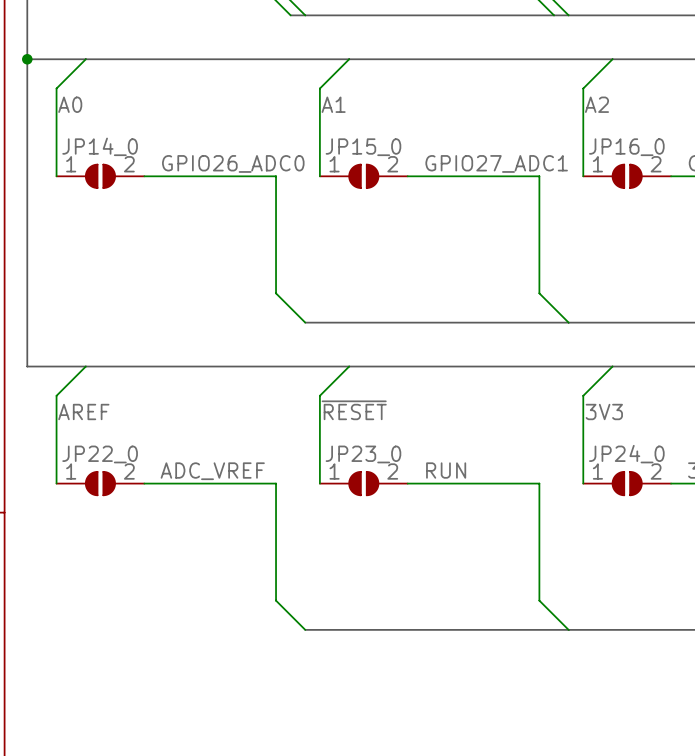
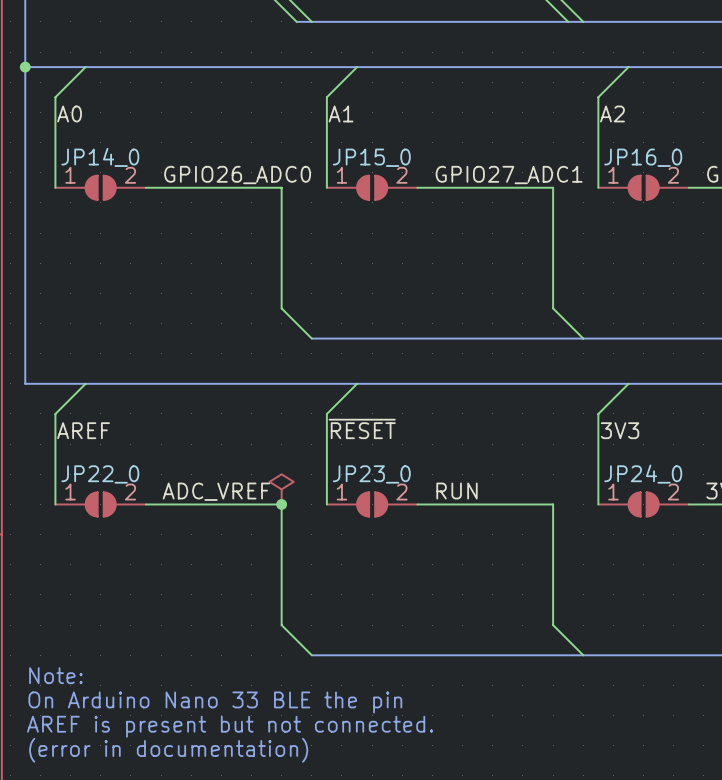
power symbol: none -> (281, 489)
junction: none -> (281, 504)
text: none -> Note: (55, 675)
text: none -> On Arduino Nano 33 BLE the pin (215, 702)
text: none -> AREF is present but not connected. (230, 726)
text: none -> (error in documentation) (168, 750)

